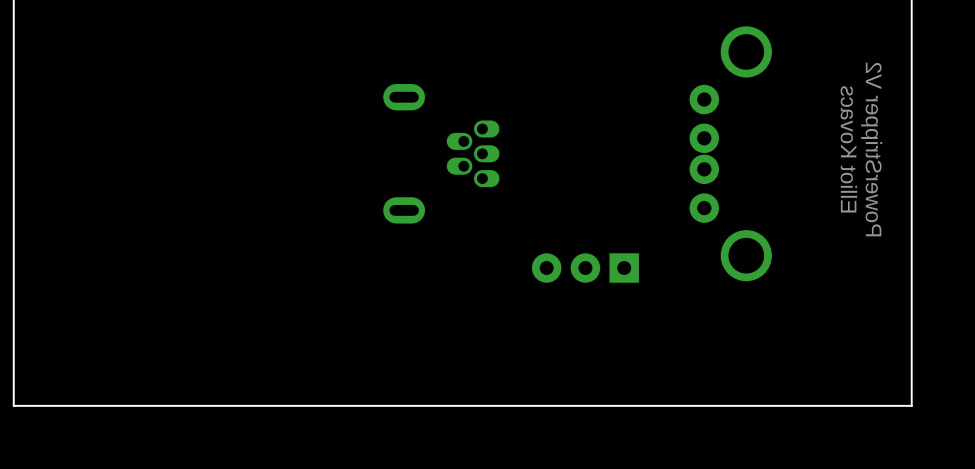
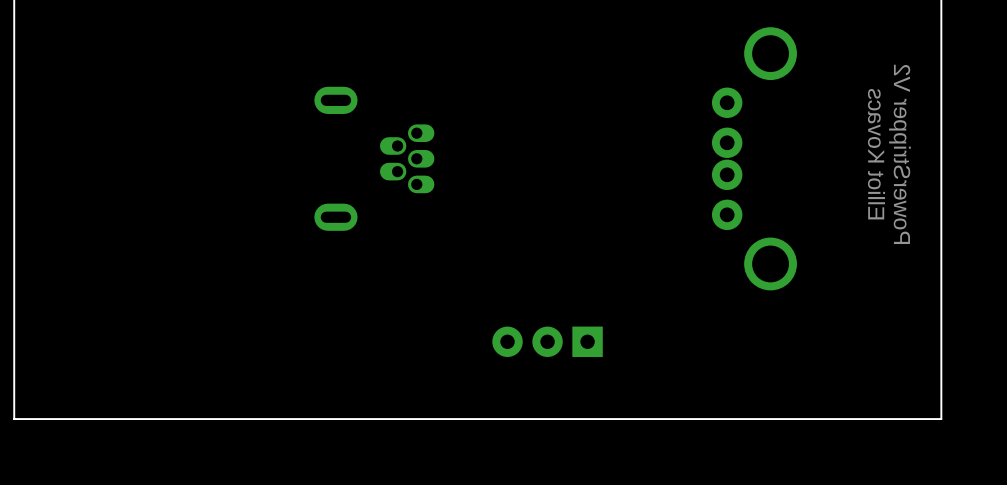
part position: (441, 153) -> (374, 158)
part position: (585, 268) -> (547, 341)

